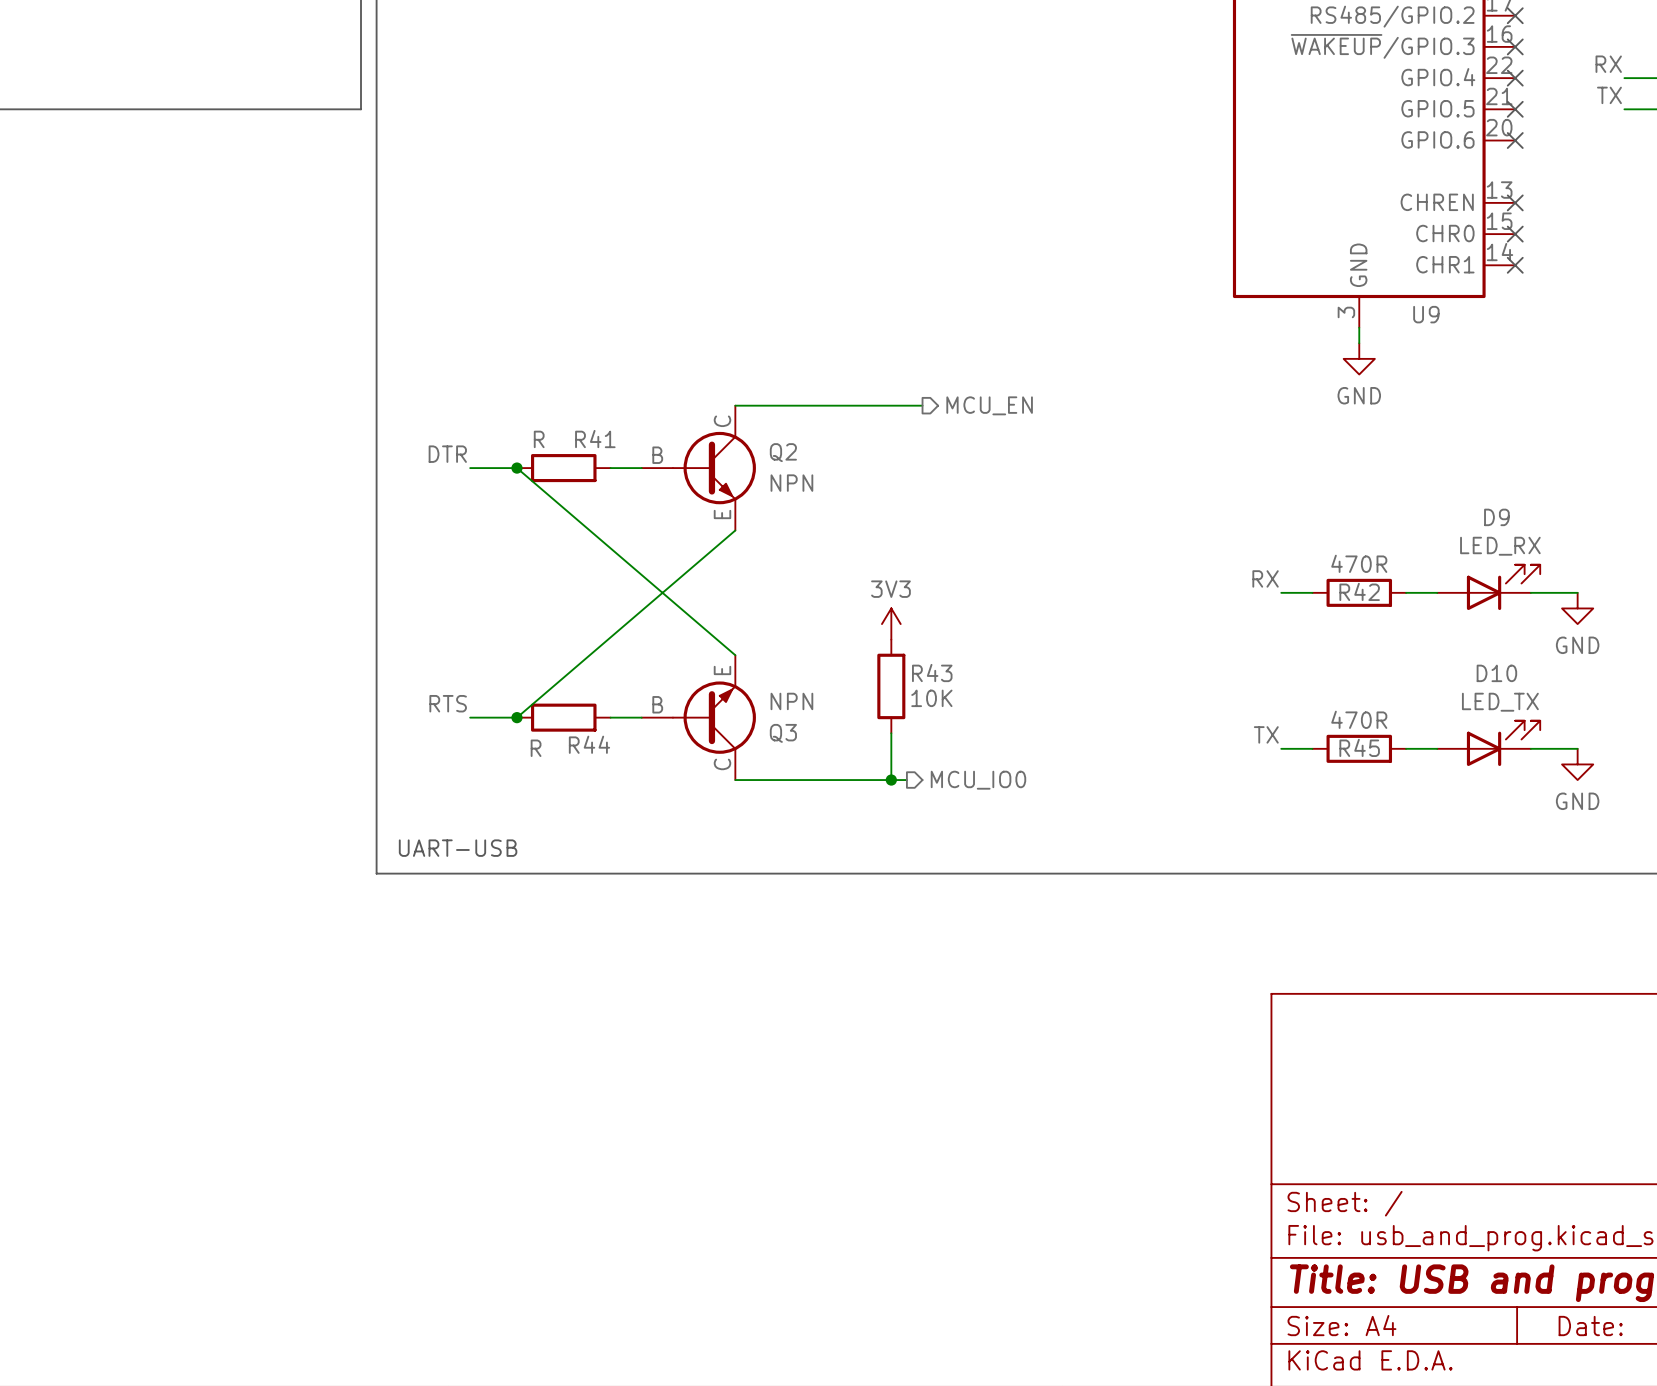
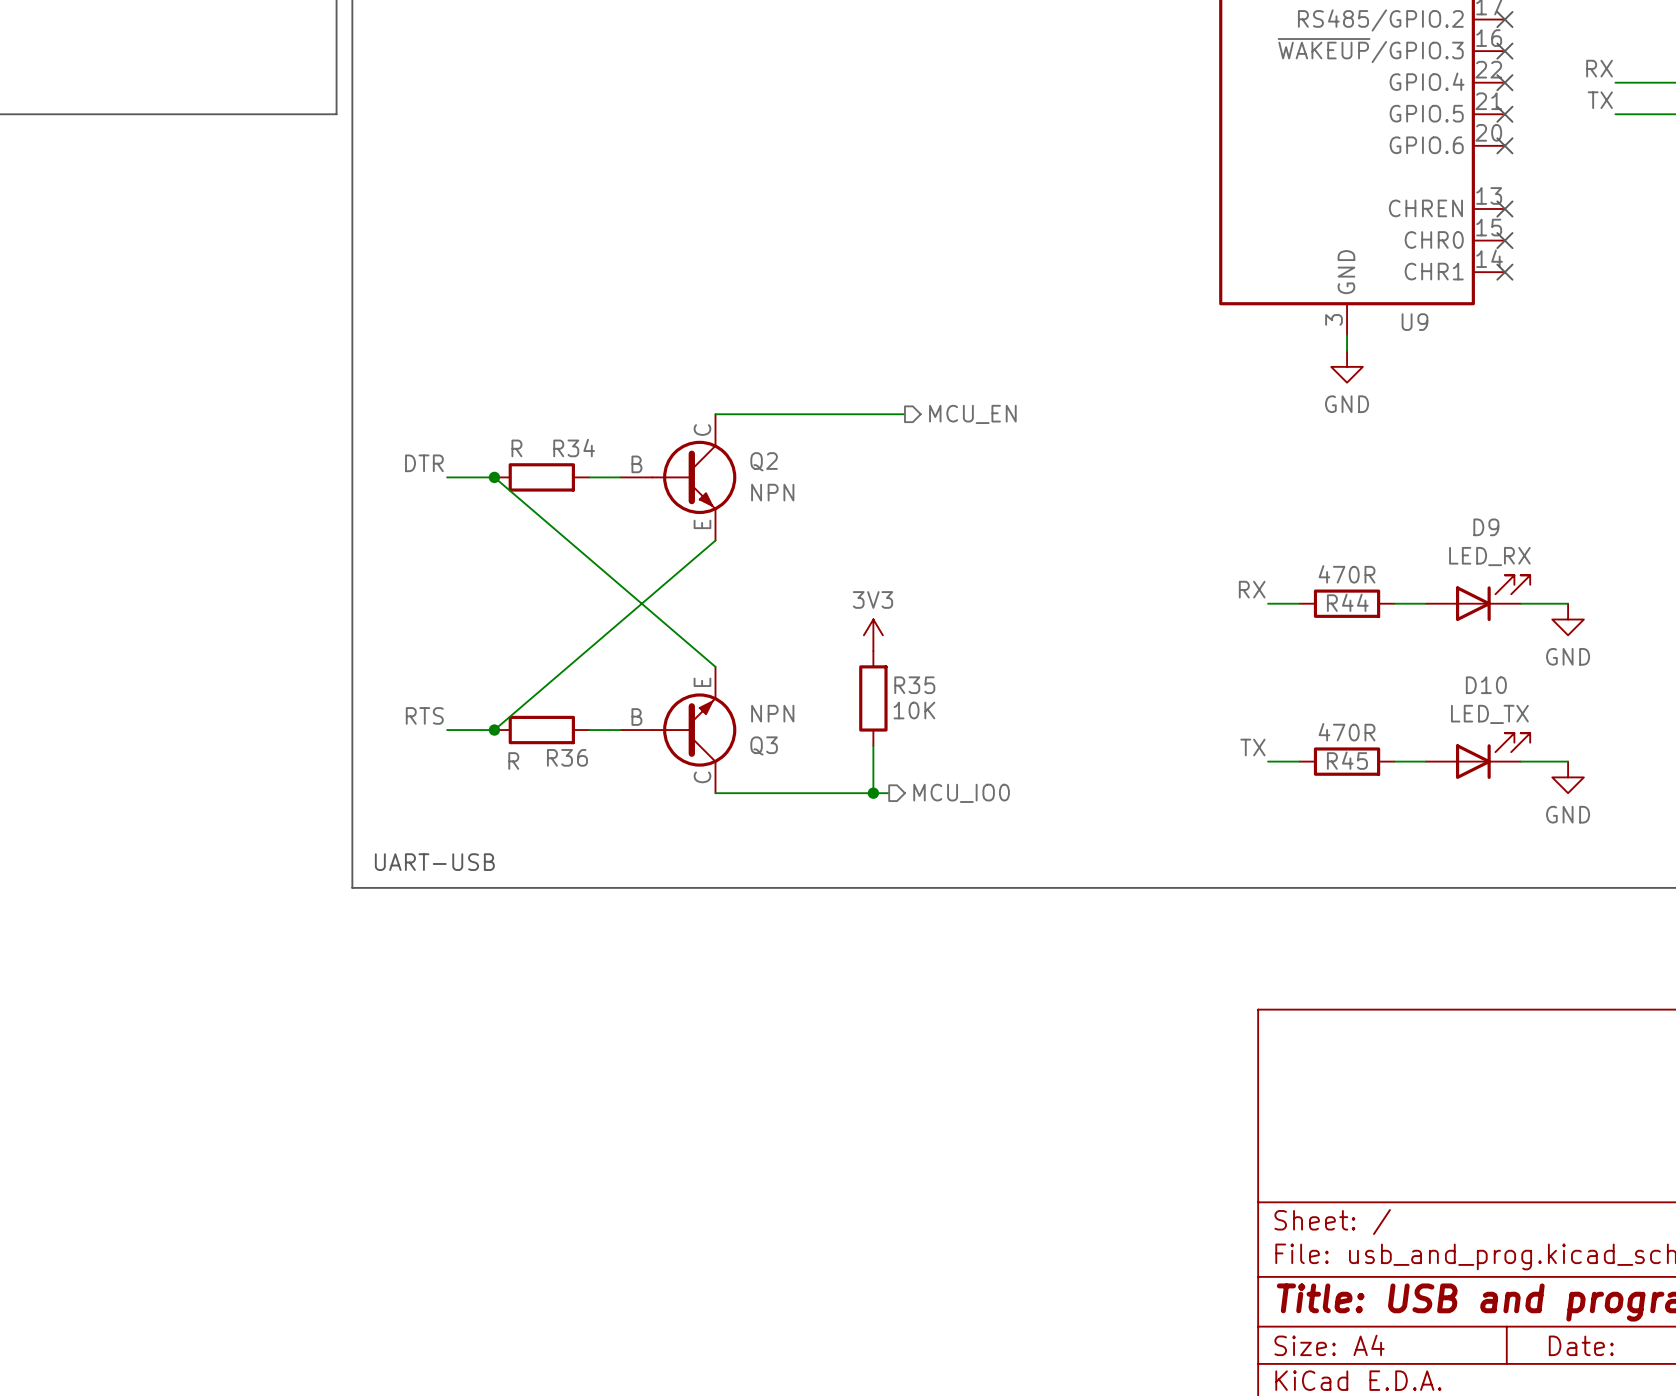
R41 name: R41 (595, 439) -> R34 (574, 448)
R42 name: R42 (1359, 591) -> R44 (1347, 602)
R43 name: R43 (932, 673) -> R35 (914, 685)
R44 name: R44 (589, 744) -> R36 (567, 757)

